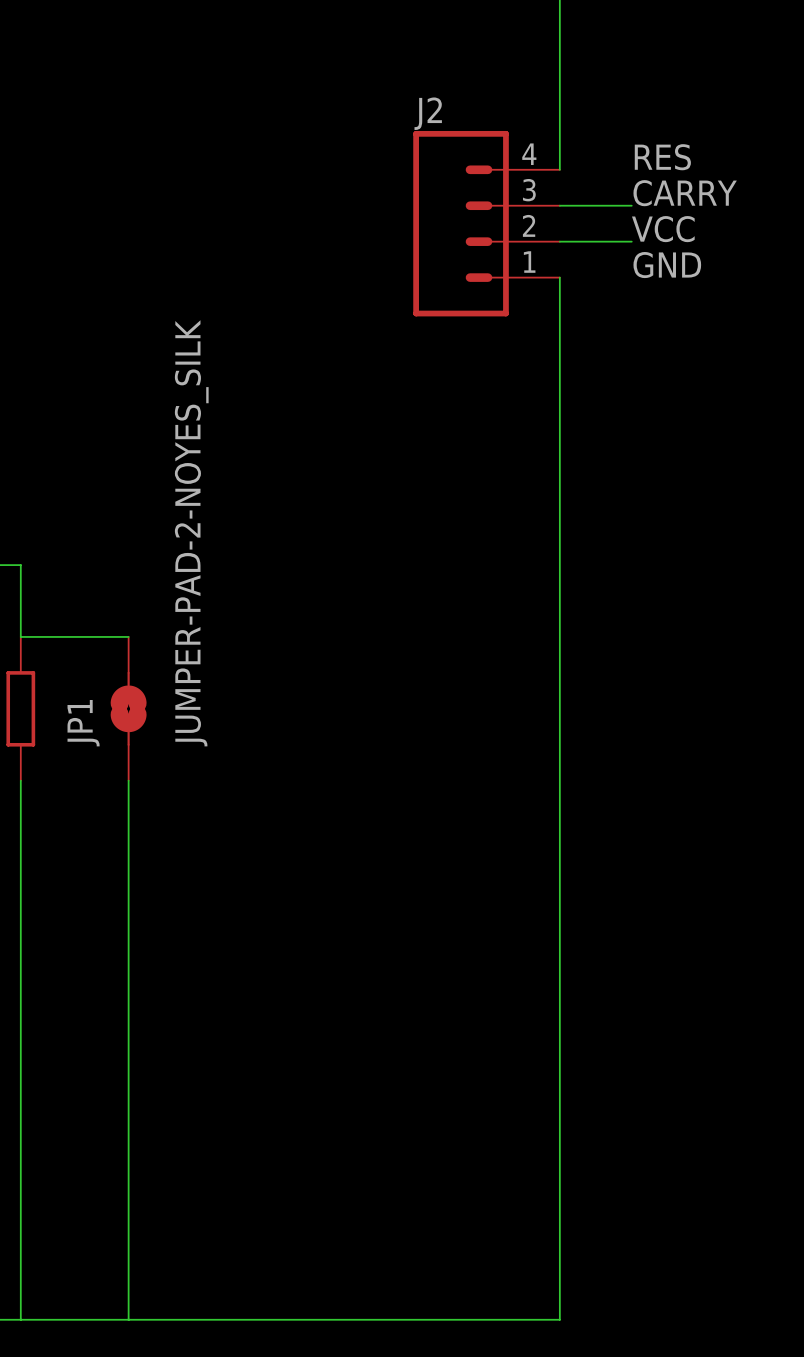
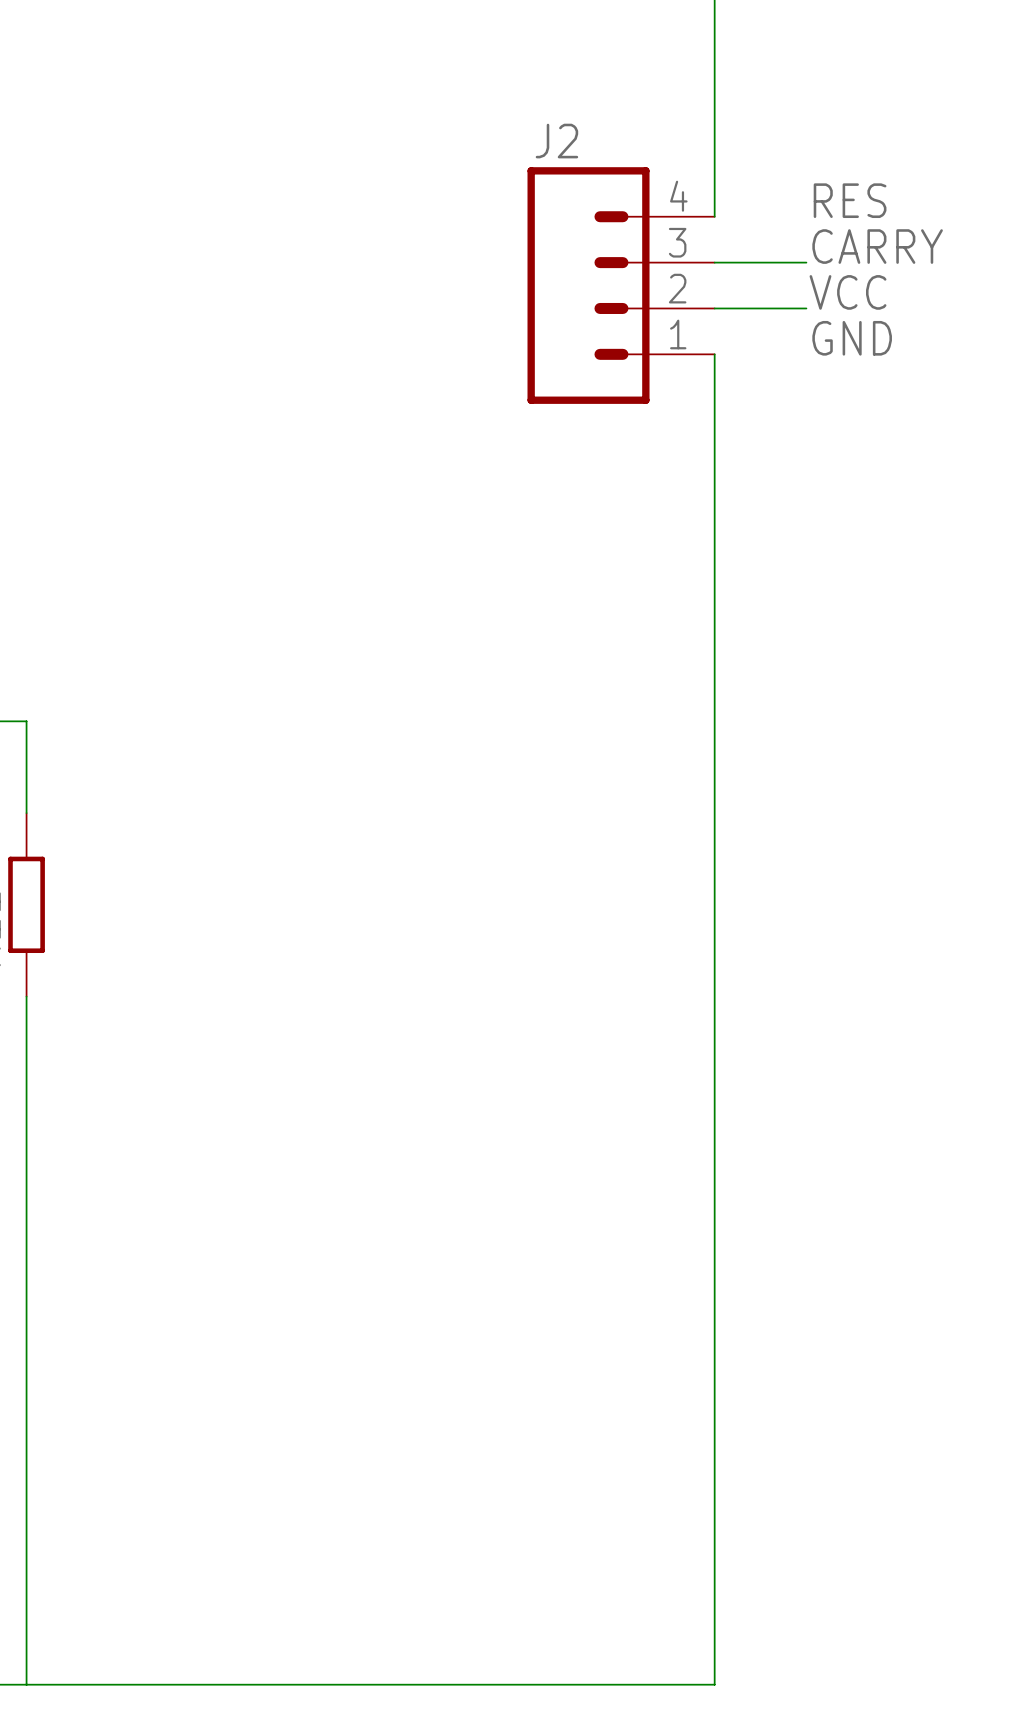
wire: (20, 636) (128, 636) -> none
JP1: JUMPER-PAD-2-NOYES_SILK (128, 708) -> none
wire: (128, 780) (128, 1319) -> none

